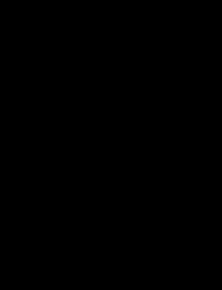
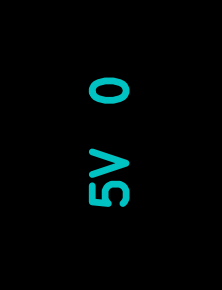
text: none -> 0 (109, 90)
text: none -> 5V (109, 177)

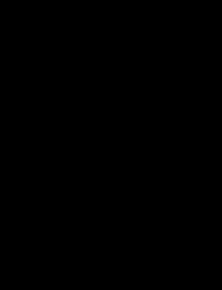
text: 0 (109, 90) -> none
text: 5V (109, 177) -> none

